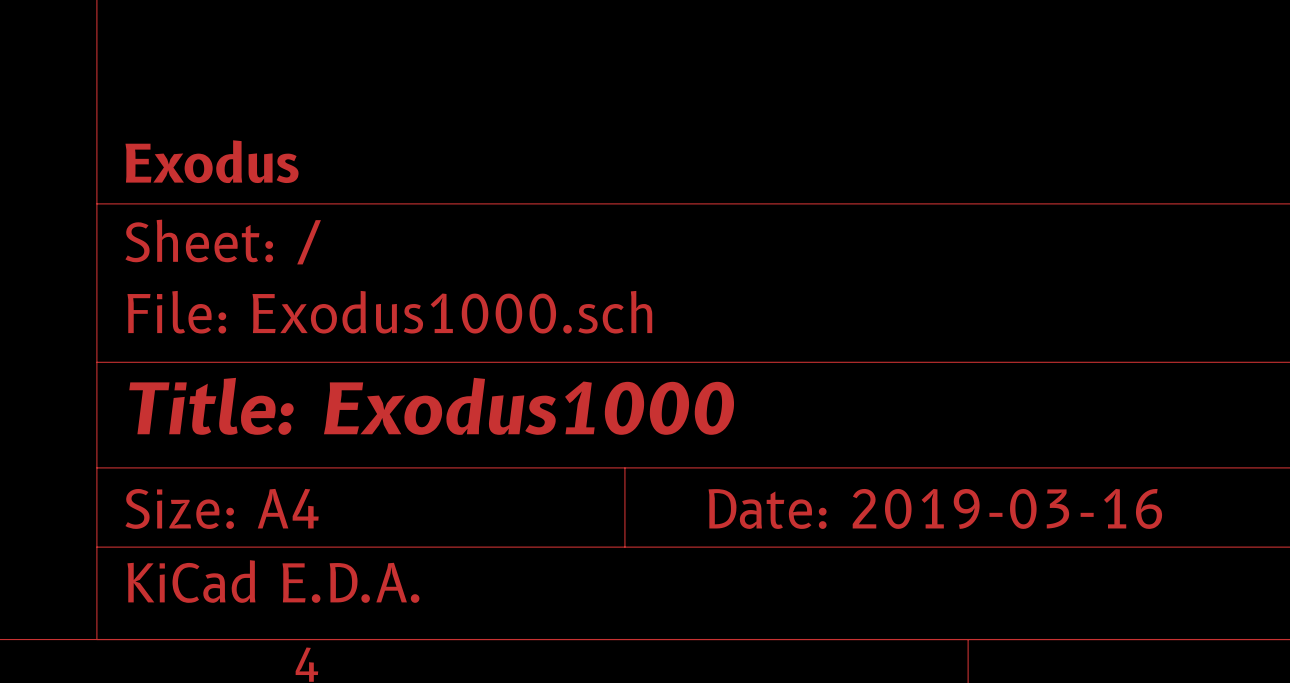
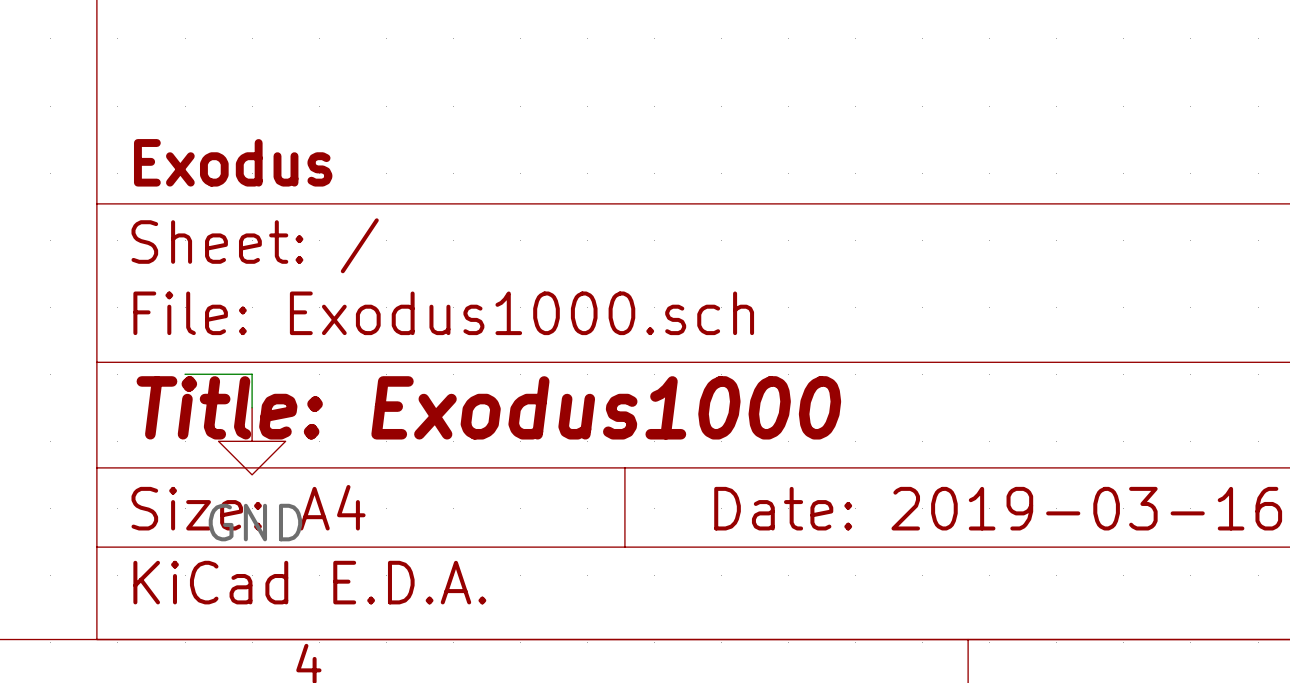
wire: none -> (185, 374) (252, 374) (252, 407)
power symbol: none -> GND (252, 441)

